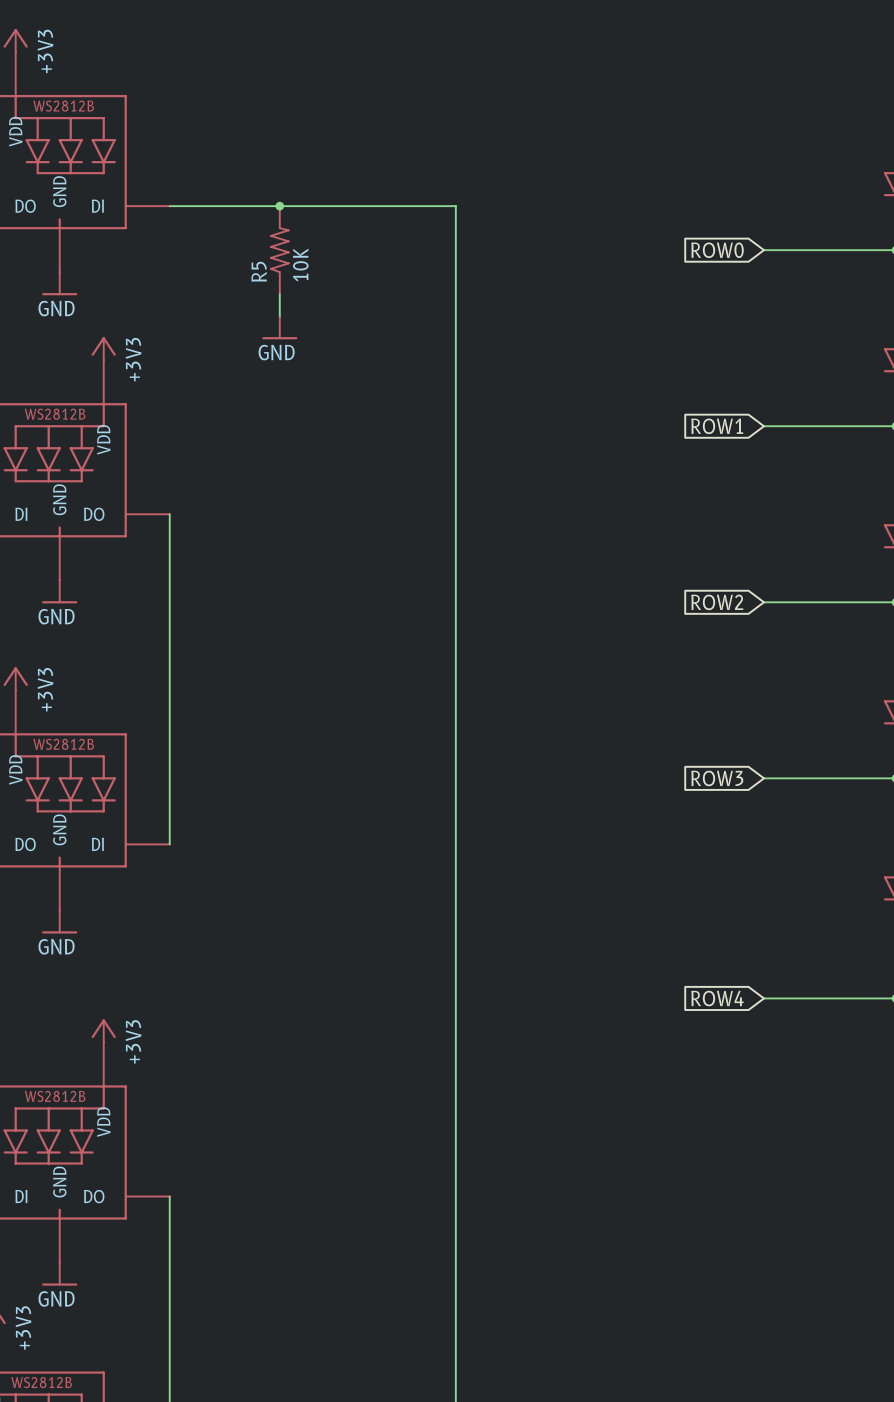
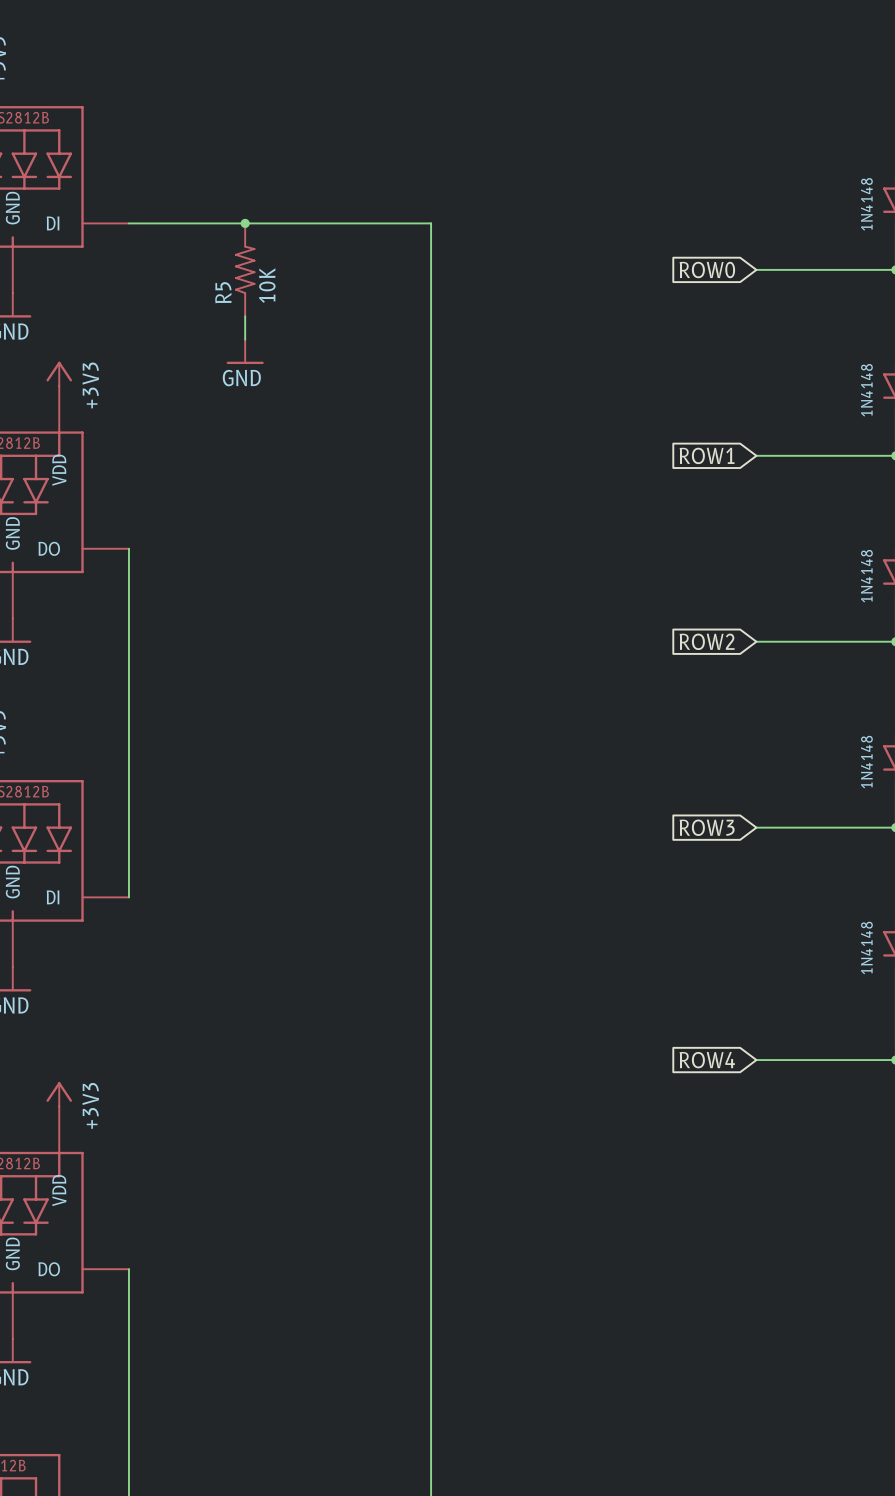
part value: none -> 1N4148 (866, 204)
part value: none -> 1N4148 (866, 390)
part value: none -> 1N4148 (866, 576)
part value: none -> 1N4148 (866, 762)
part value: none -> 1N4148 (866, 948)

